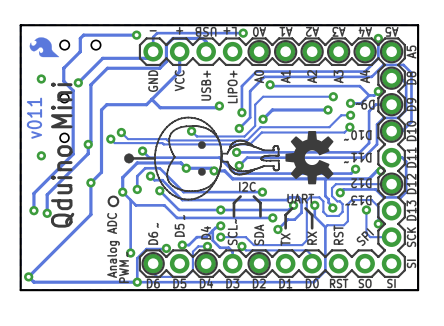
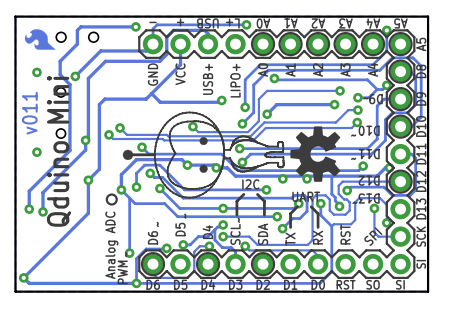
via: none -> (282, 178)
via: none -> (307, 178)

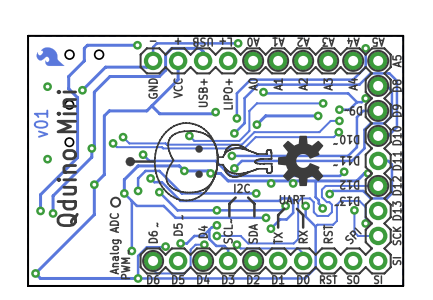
text: v011 (29, 113) -> v01 (41, 123)

